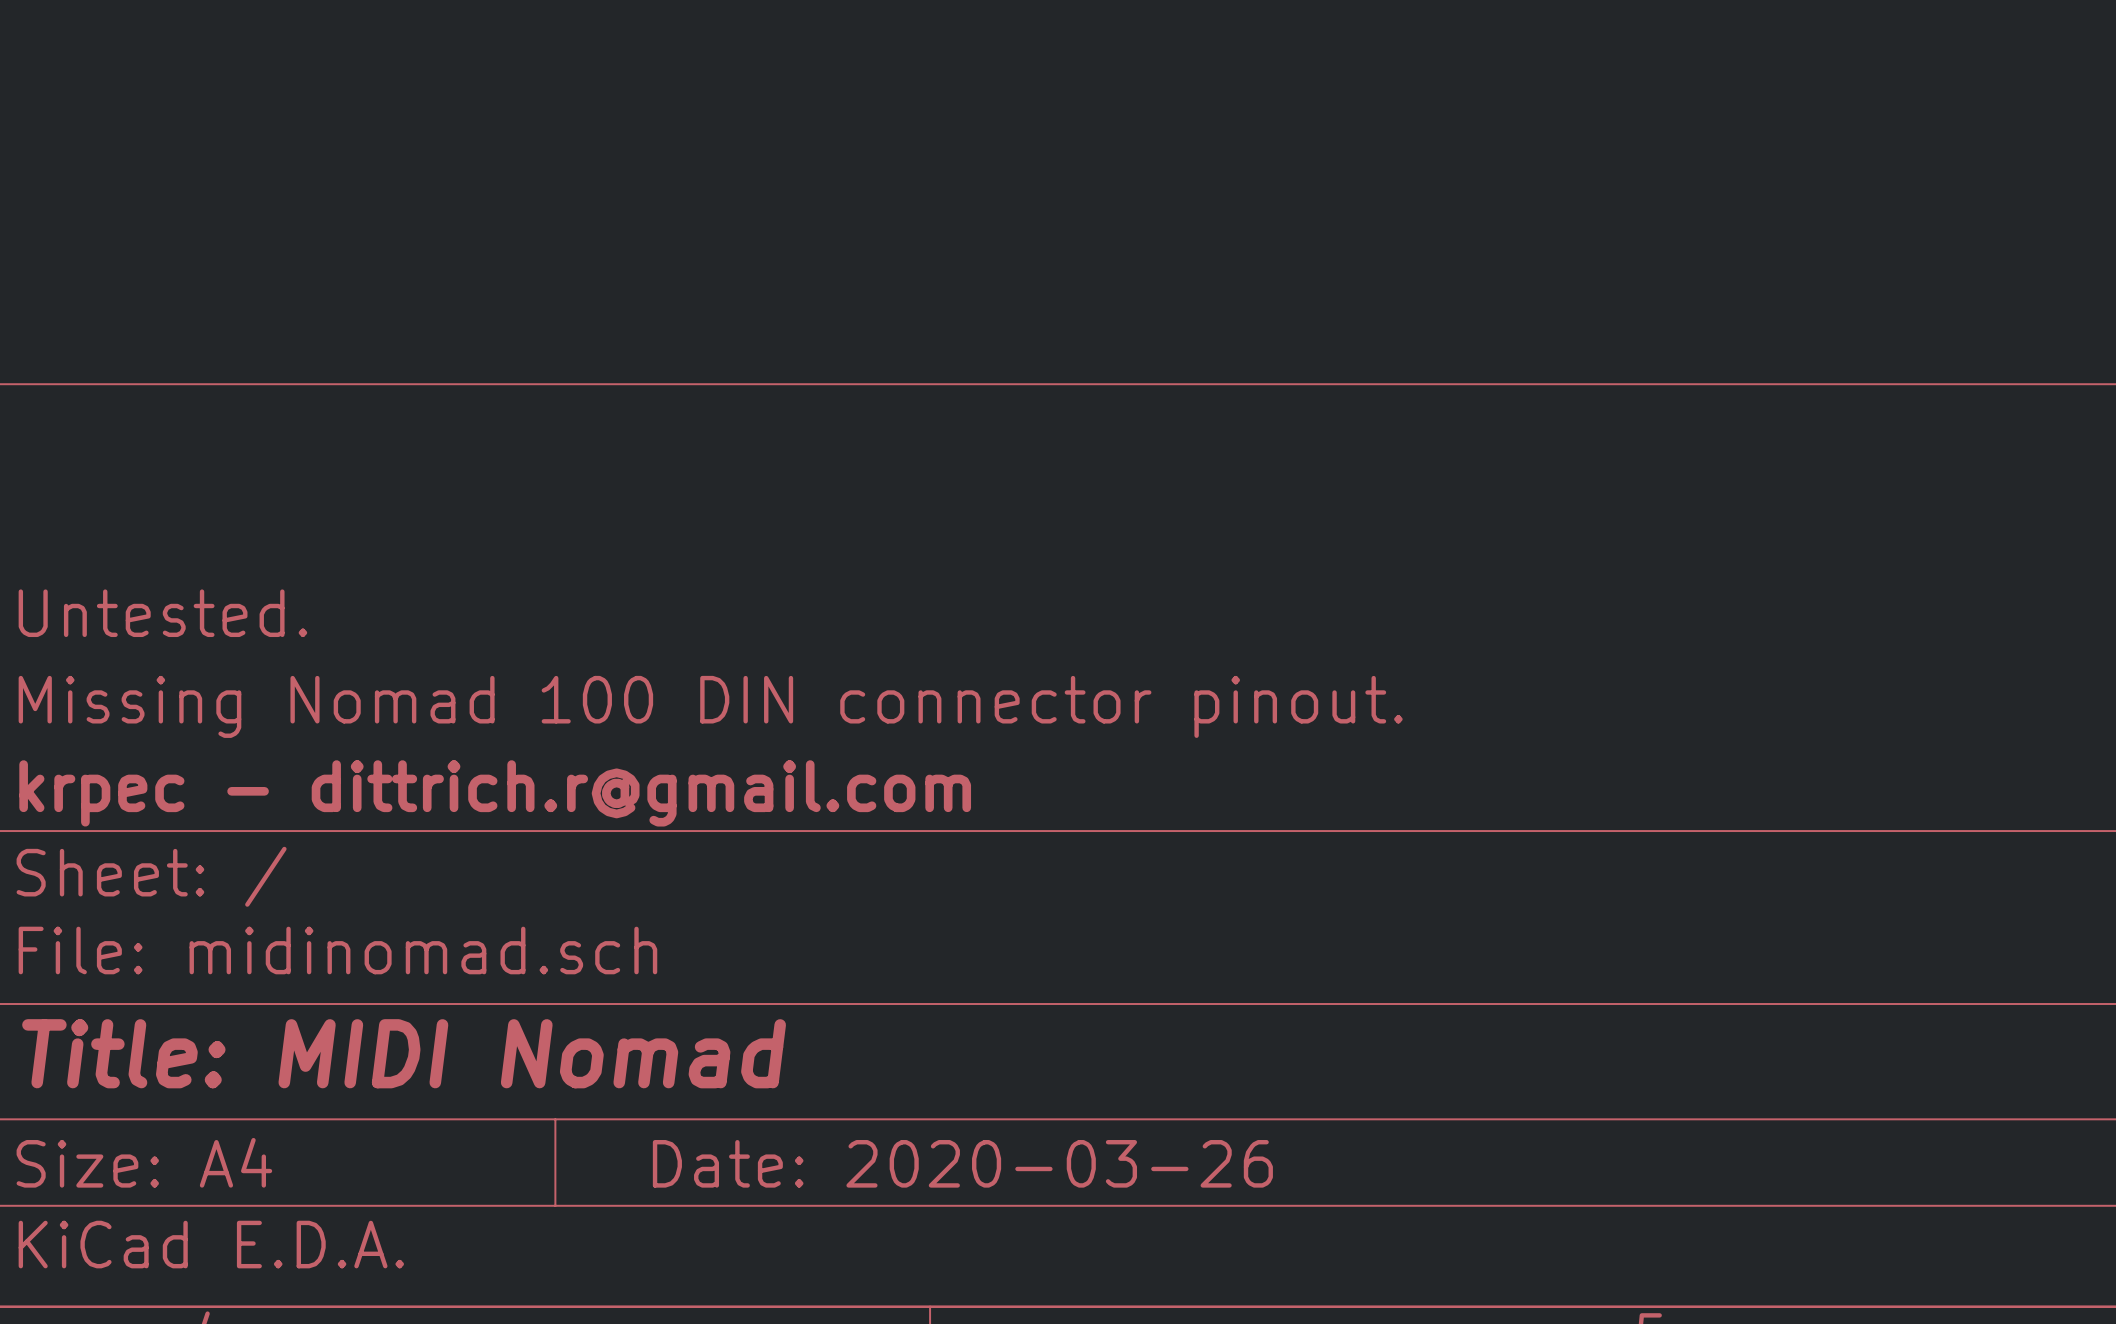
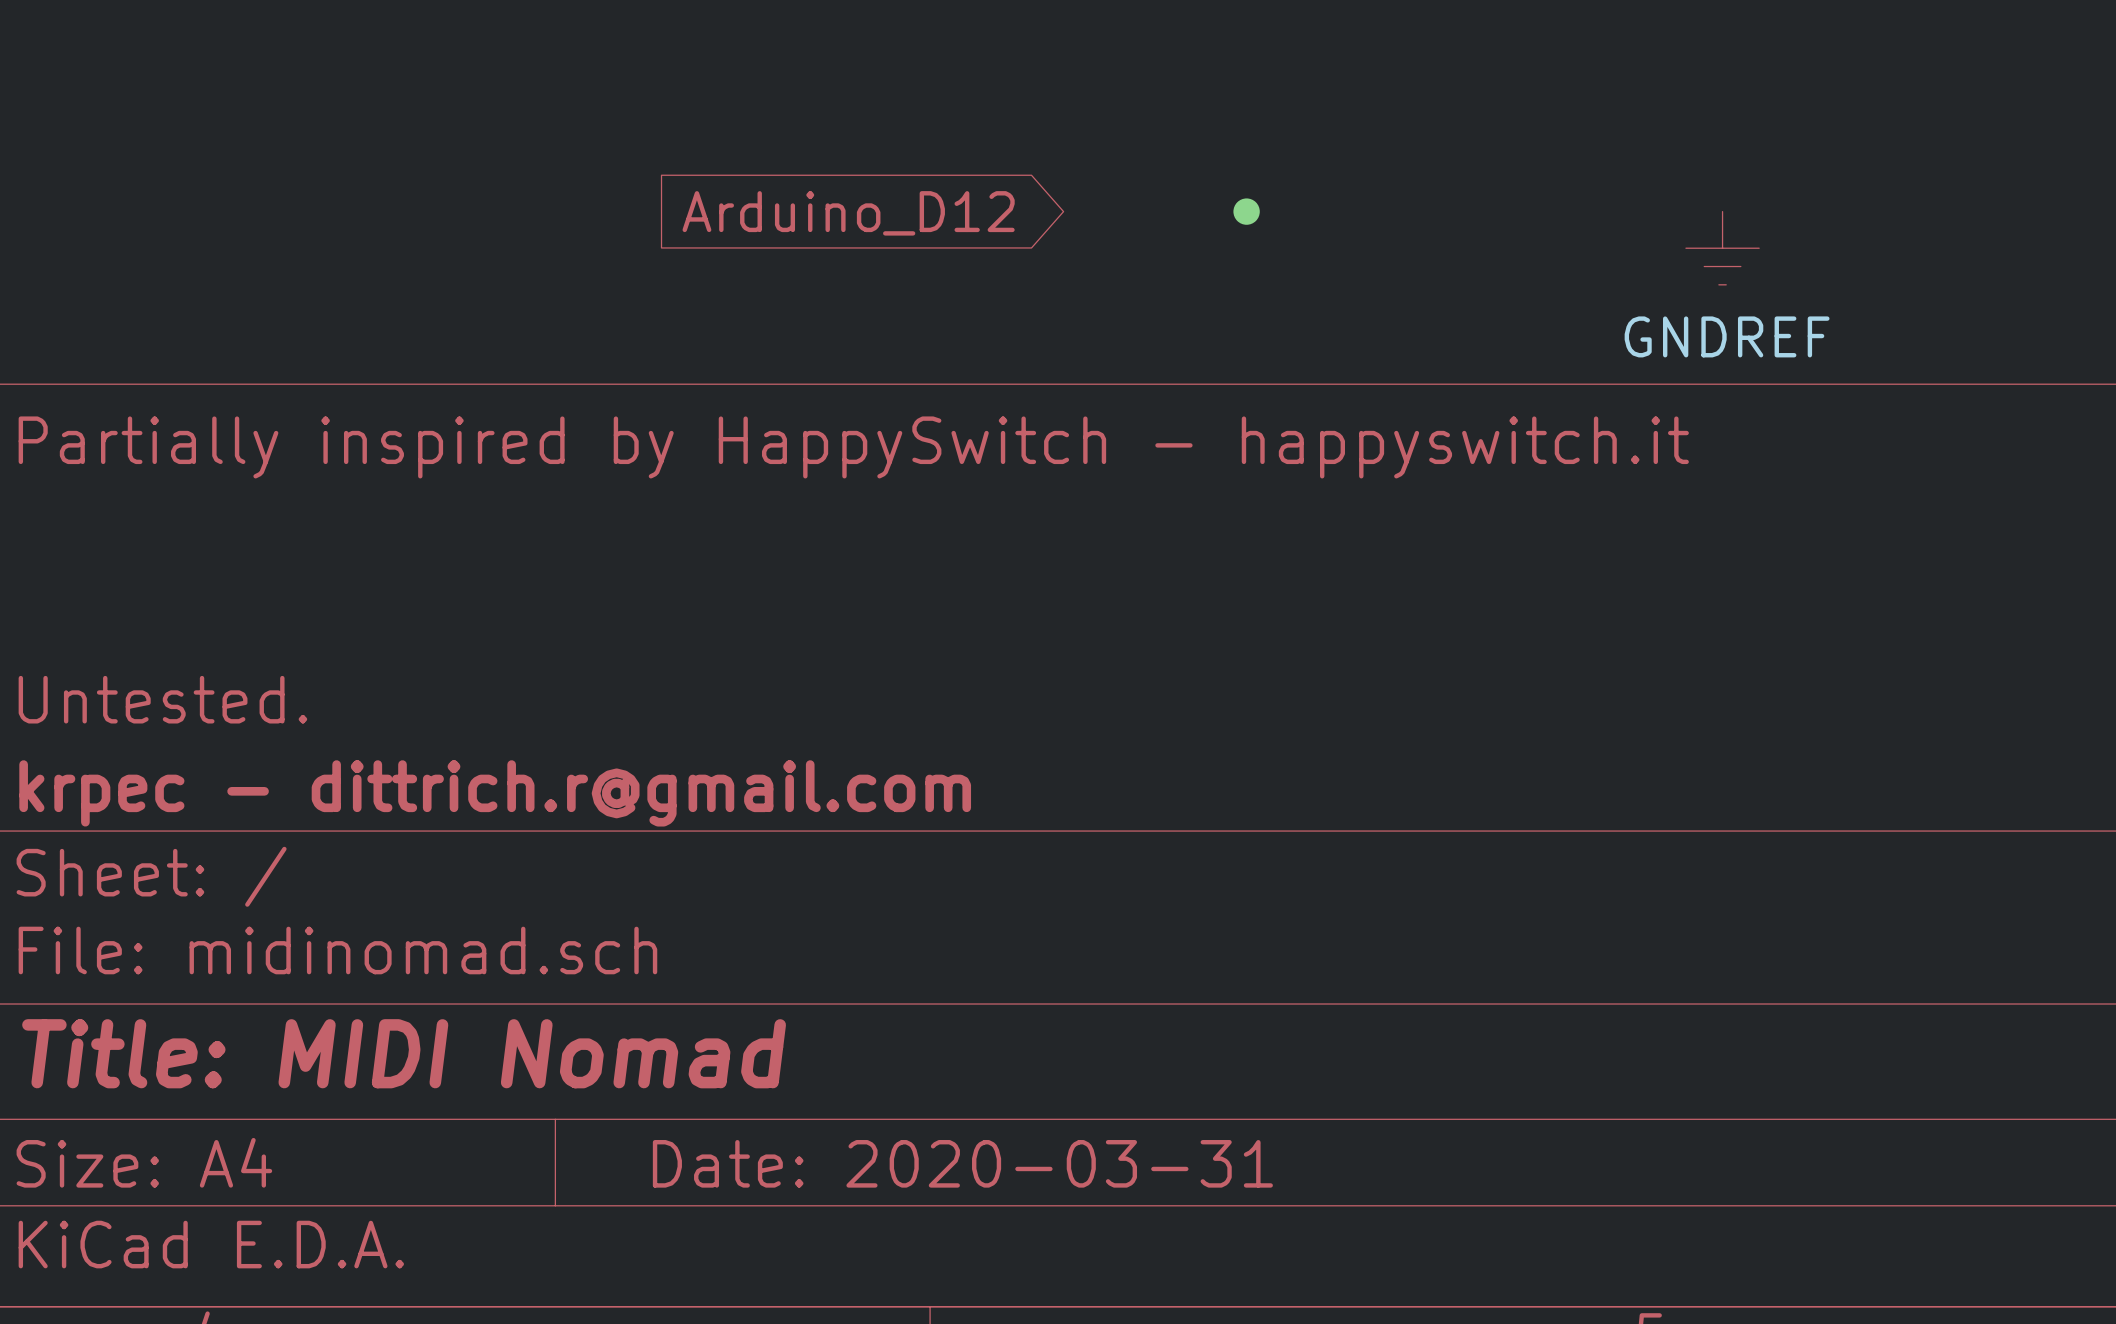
junction: none -> (1246, 211)
global label: none -> Arduino_D12 (848, 213)
power symbol: none -> GNDREF (1722, 248)
title block: none -> Partially inspired by HappySwitch - happyswitch.it (853, 447)
title block: Untested. (162, 613) -> none
title block: Missing Nomad 100 DIN connector pinout. (710, 706) -> Untested. (162, 699)
title block: Date: 2020-03-26 (962, 1163) -> Date: 2020-03-31 (962, 1163)

